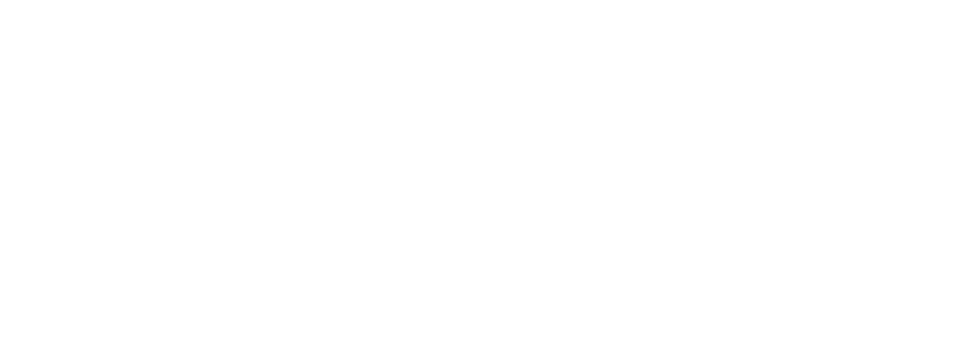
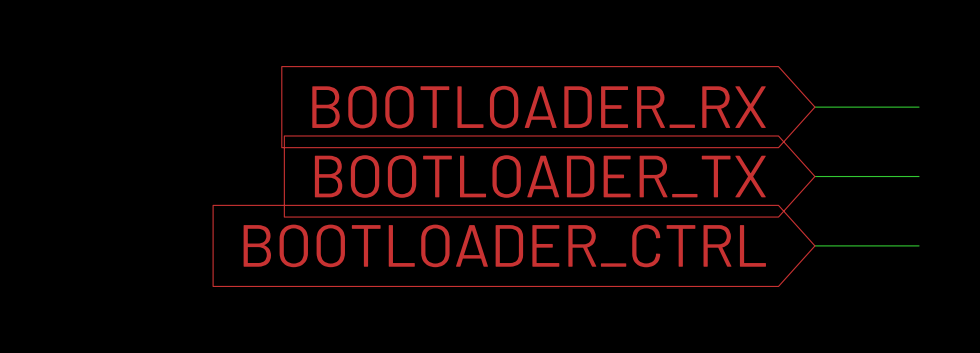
wire: none -> (814, 107) (919, 107)
global label: none -> BOOTLOADER_RX (539, 107)
wire: none -> (814, 176) (919, 176)
global label: none -> BOOTLOADER_TX (540, 176)
wire: none -> (814, 245) (919, 245)
global label: none -> BOOTLOADER_CTRL (504, 245)

